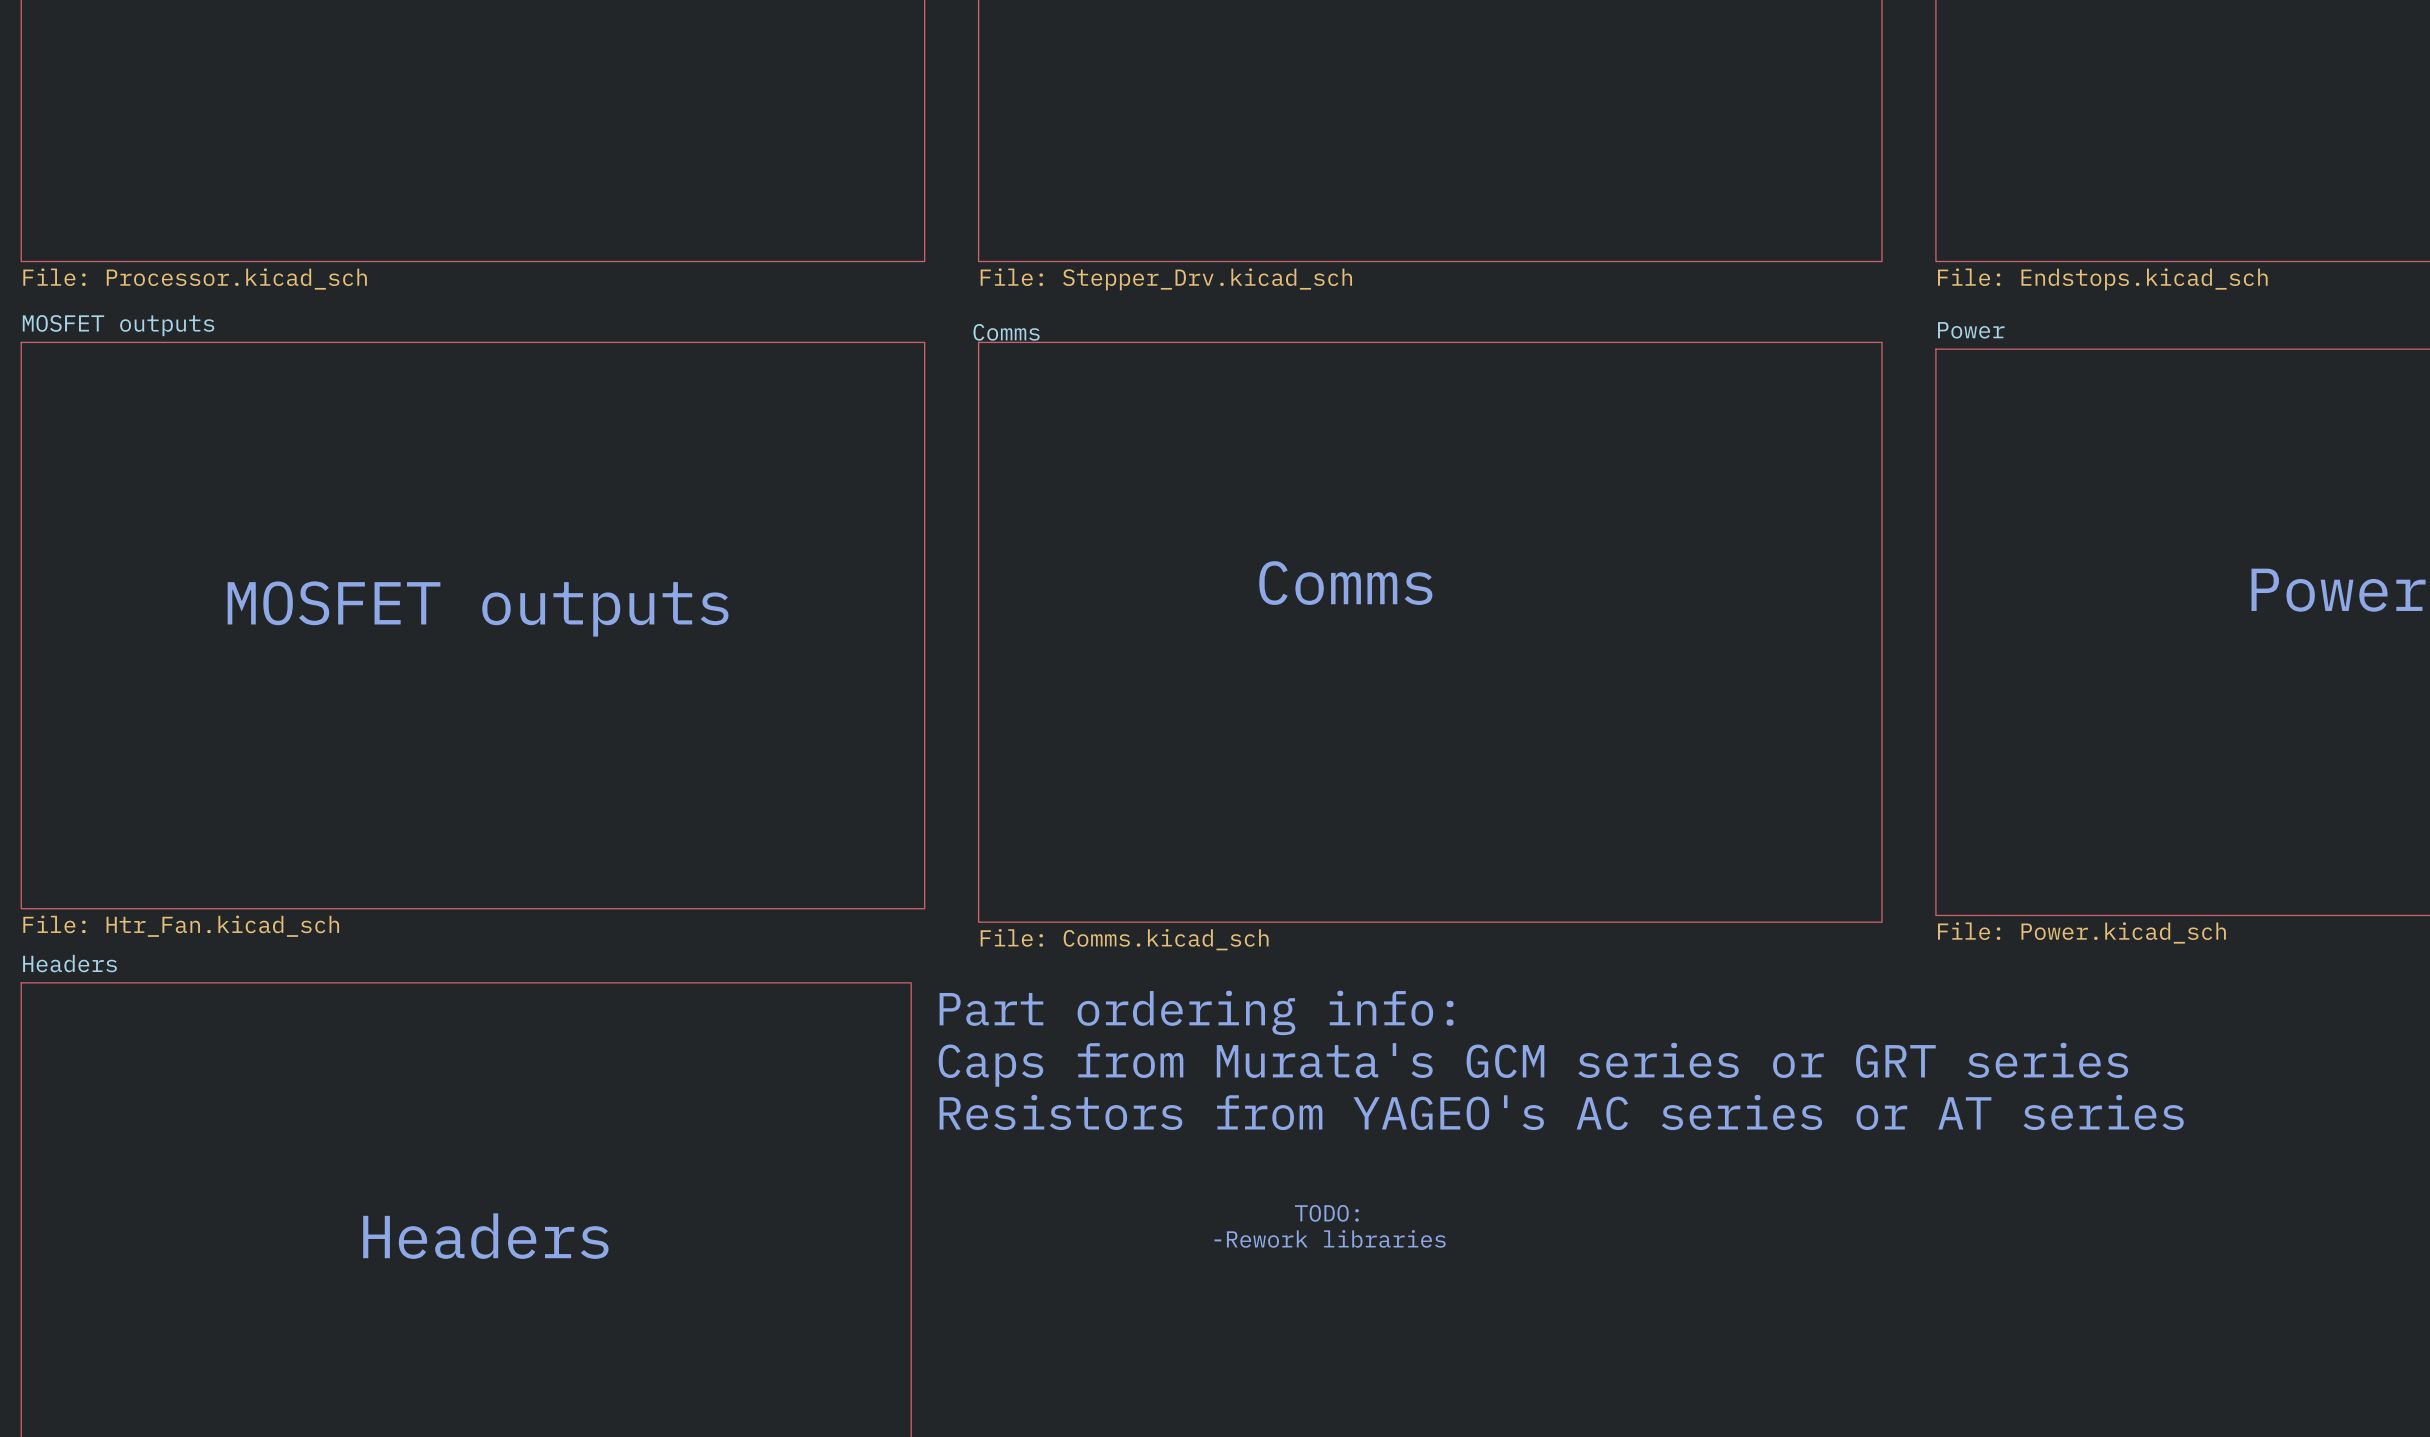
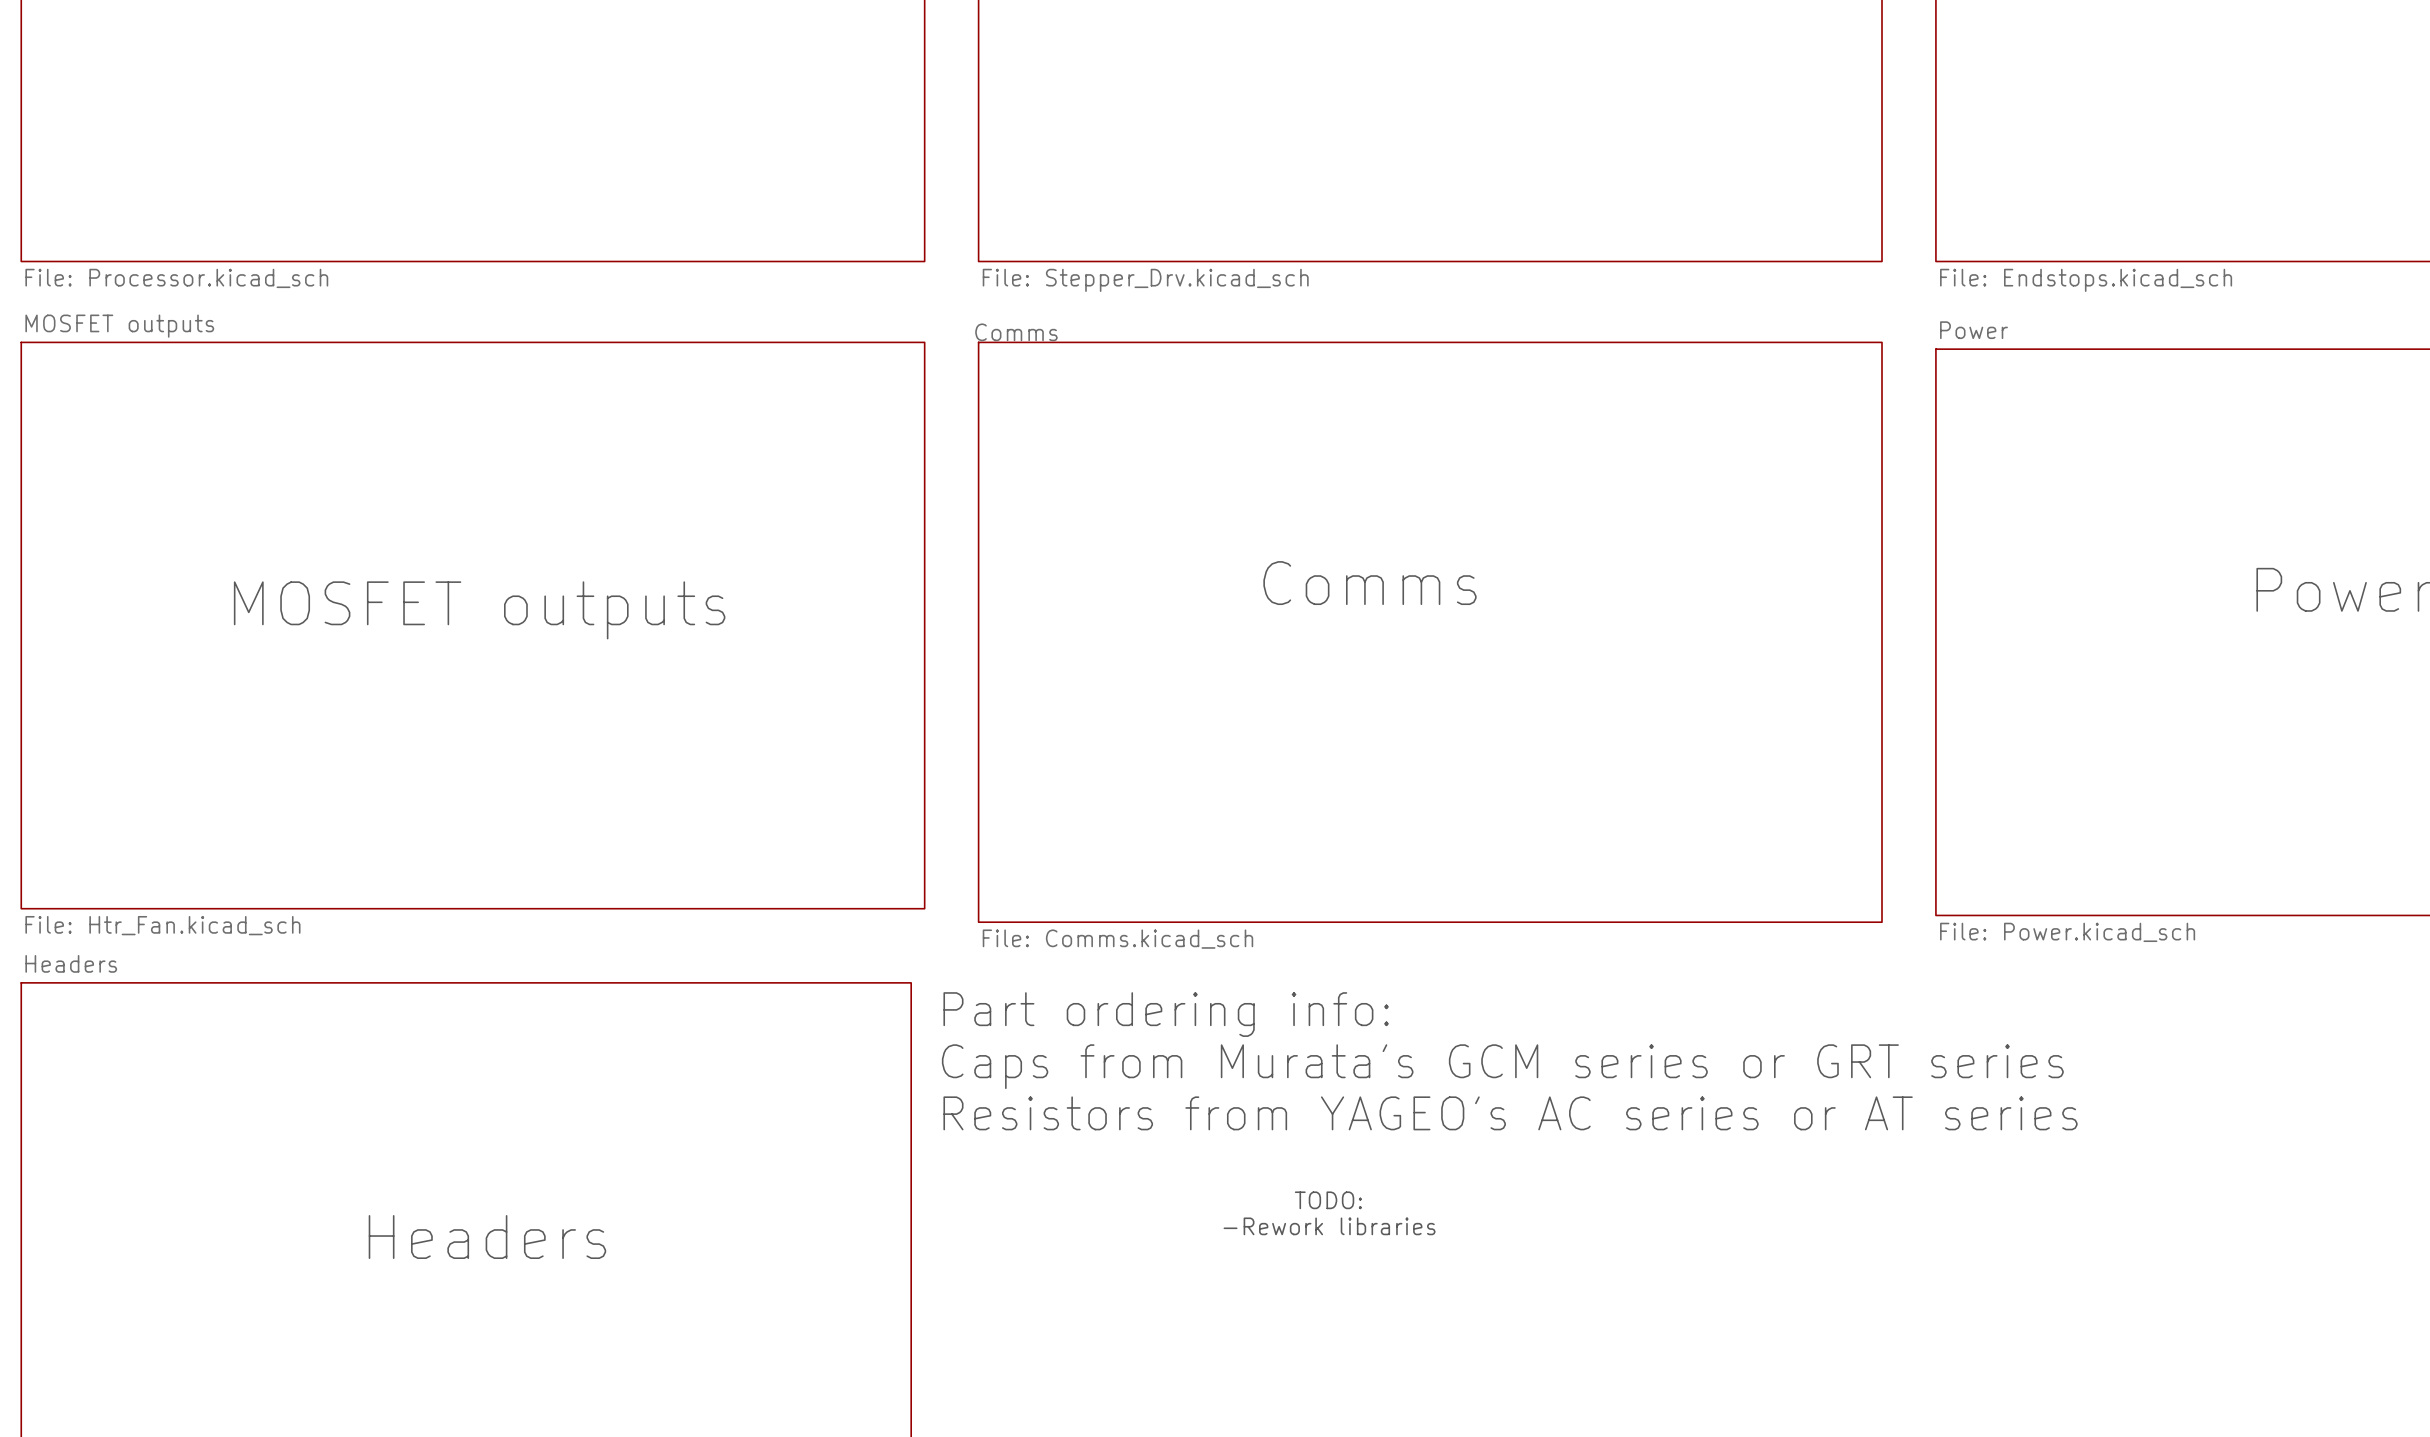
text position: TODO: (1326, 1213) -> TODO: (1328, 1200)
text position: -Rework libraries (1330, 1238) -> -Rework libraries (1329, 1226)

